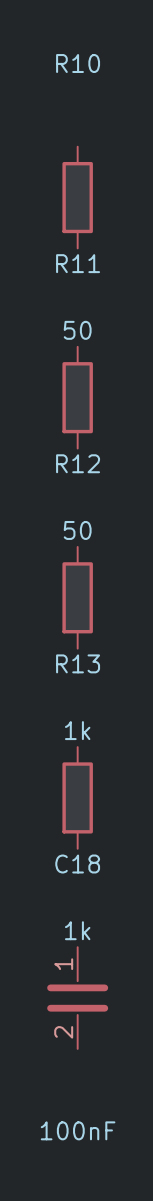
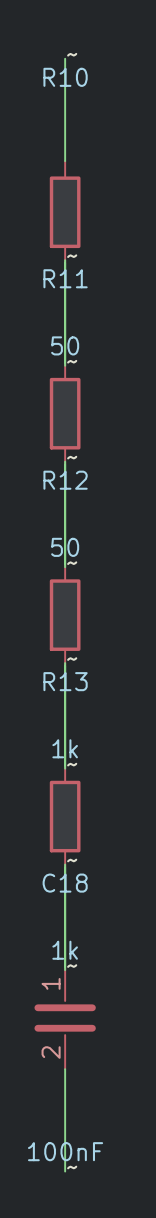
label: none -> ~ (72, 54)
wire: none -> (65, 58) (65, 161)
label: none -> ~ (72, 256)
wire: none -> (65, 260) (65, 365)
label: none -> ~ (72, 361)
label: none -> ~ (72, 457)
wire: none -> (65, 461) (65, 567)
label: none -> ~ (72, 563)
label: none -> ~ (72, 659)
wire: none -> (65, 663) (65, 768)
label: none -> ~ (72, 764)
label: none -> ~ (72, 860)
wire: none -> (65, 864) (65, 970)
label: none -> ~ (72, 966)
wire: none -> (65, 1069) (65, 1171)
label: none -> ~ (72, 1167)

